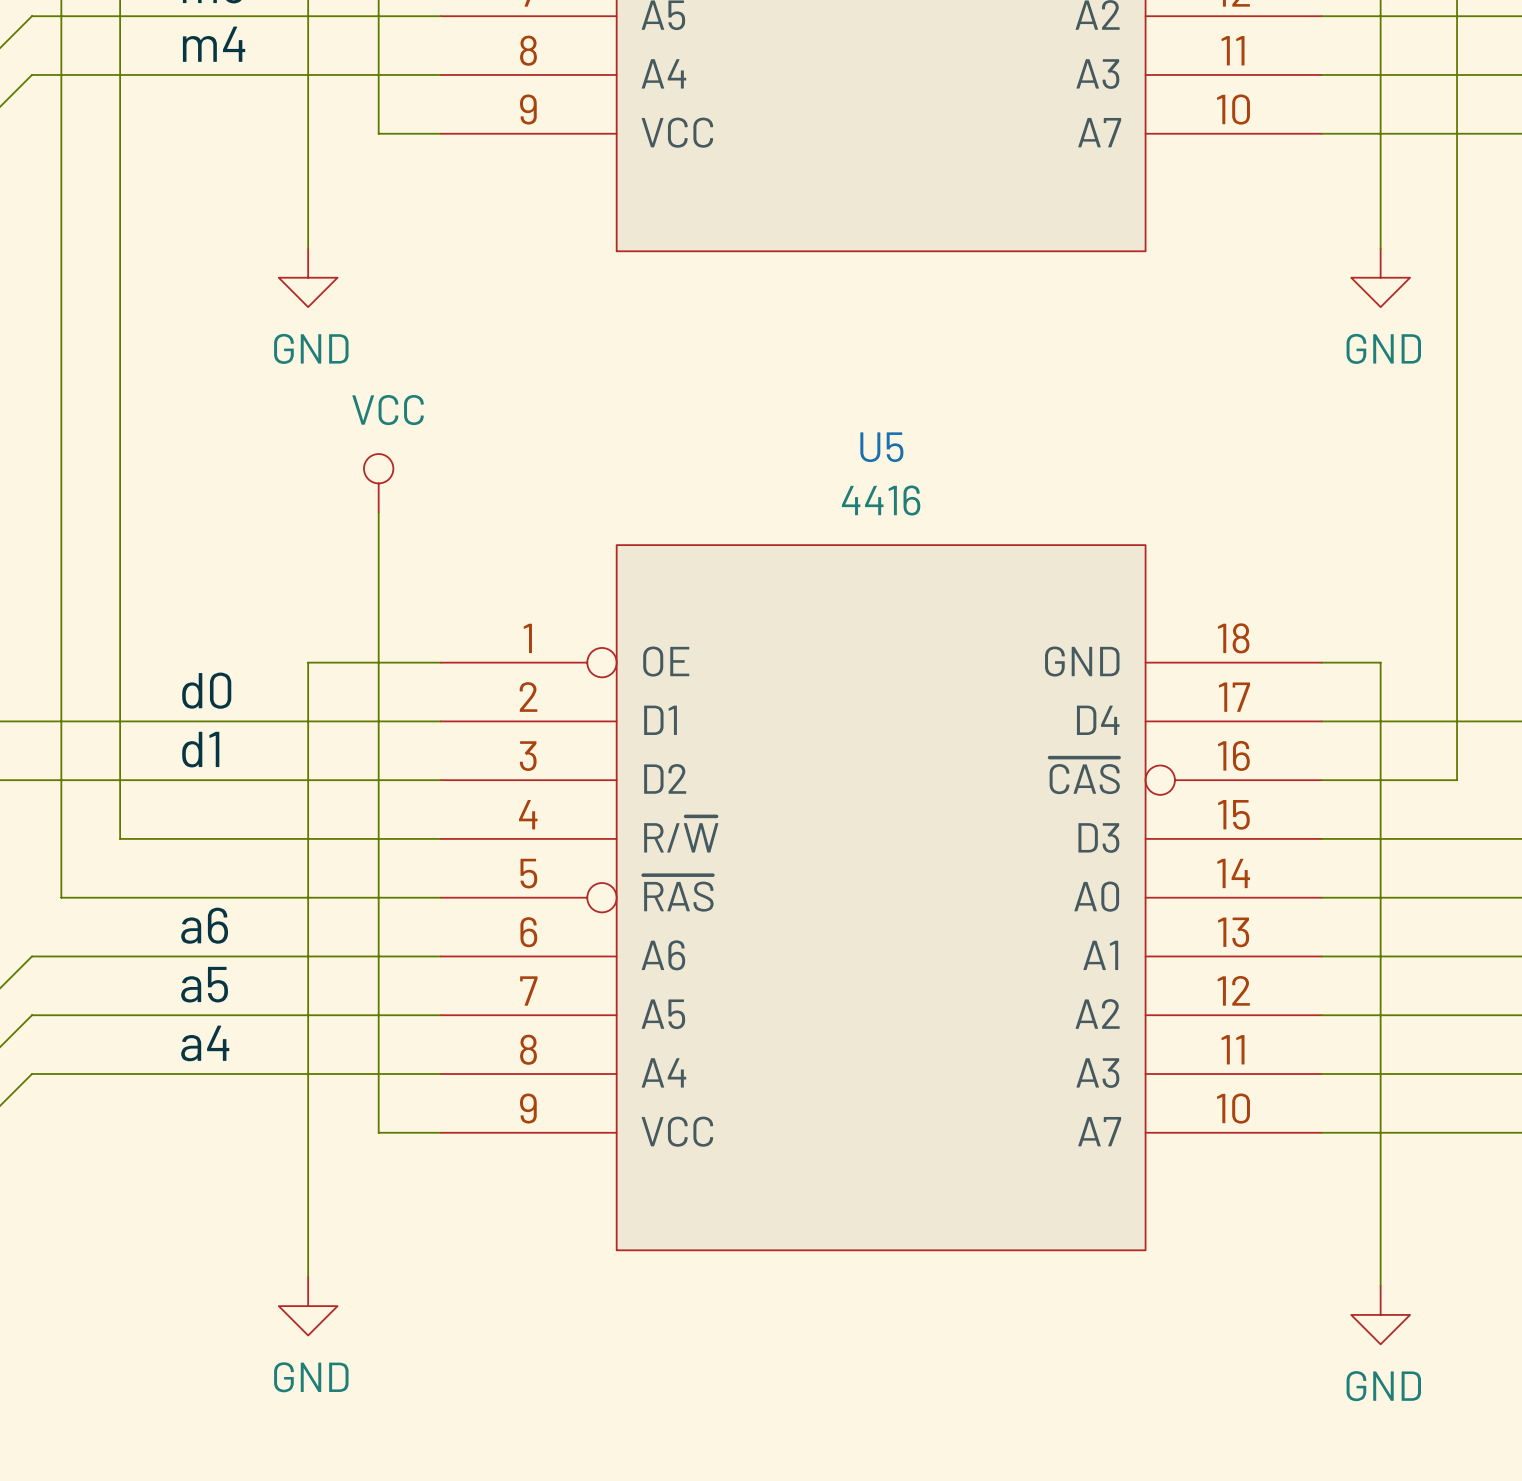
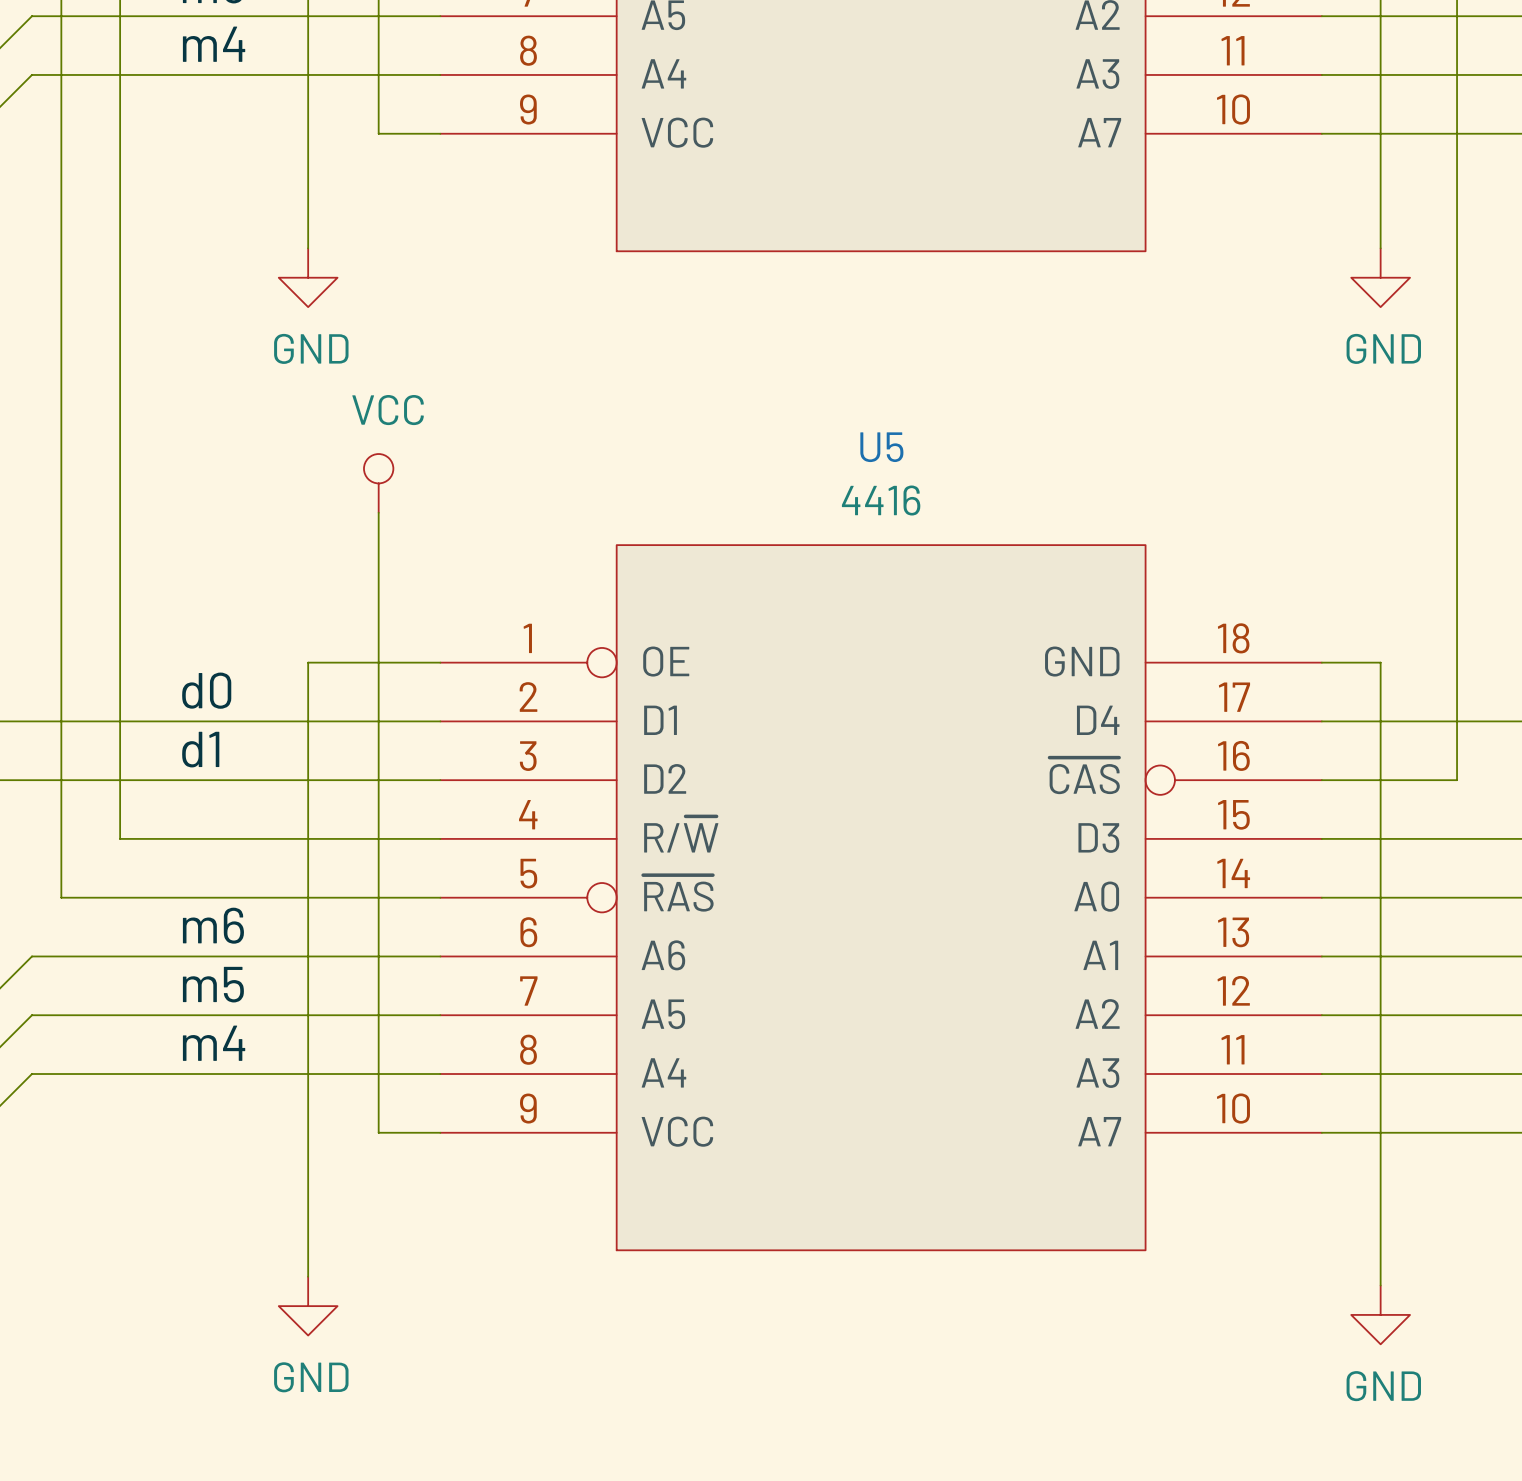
label: a6 (204, 925) -> m6 (213, 925)
label: a5 (204, 984) -> m5 (213, 984)
label: a4 (205, 1043) -> m4 (214, 1043)

